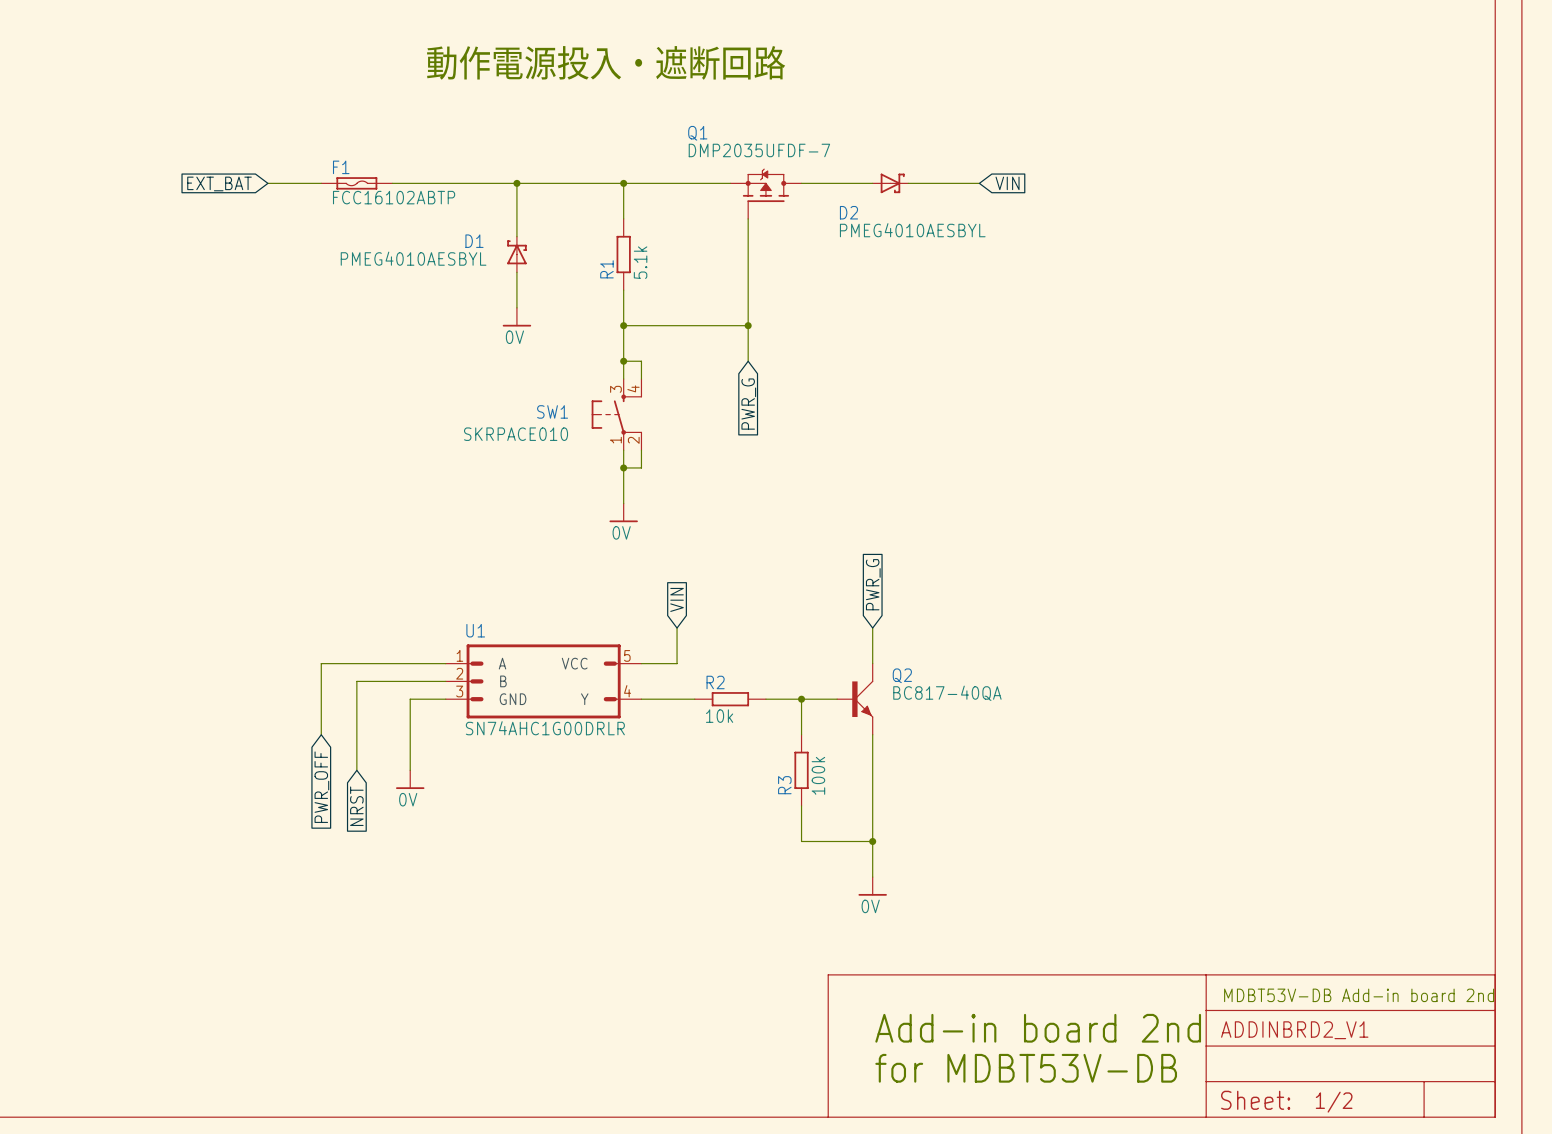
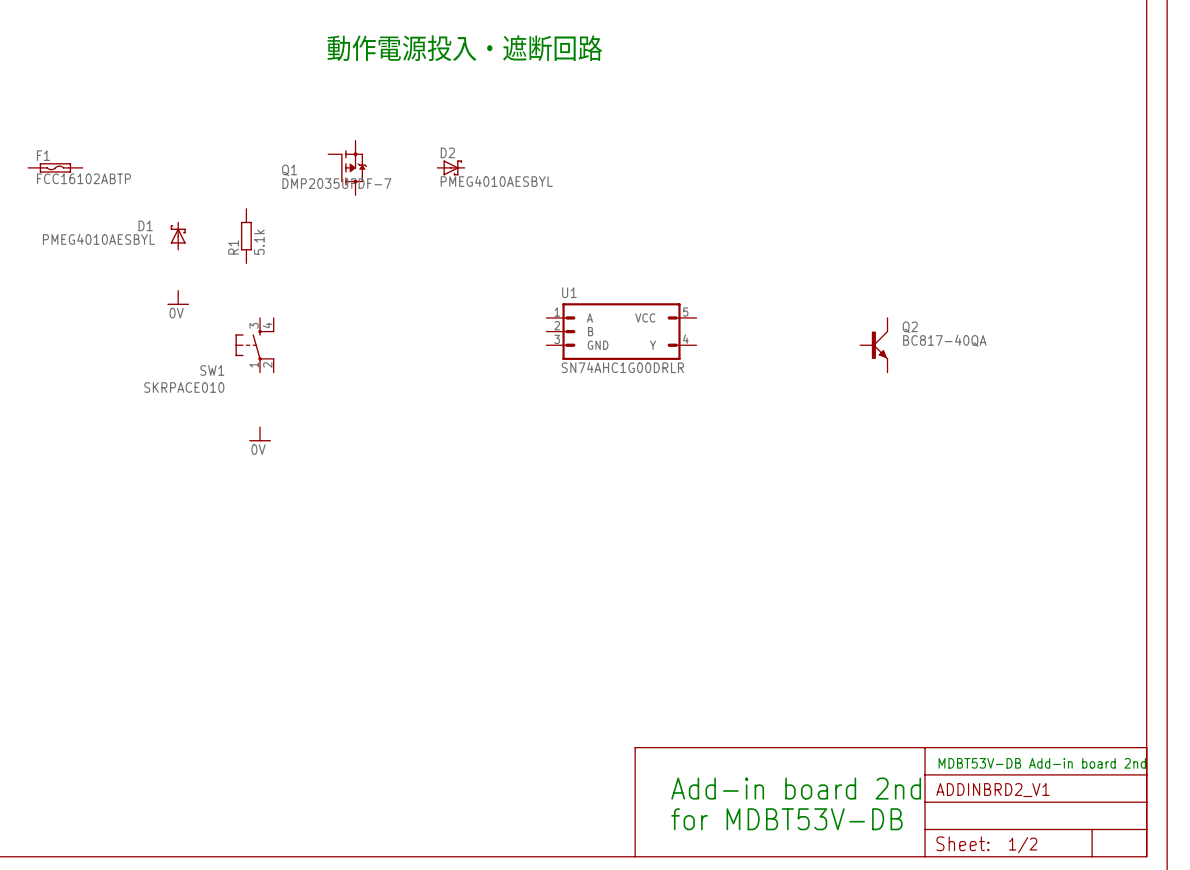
Q1 name position: Q1 (697, 133) -> Q1 (289, 170)
Q1 value position: DMP2035UFDF-7 (759, 150) -> DMP2035UFDF-7 (336, 183)
global label: EXT_BAT (219, 183) -> none
wire: (267, 183) (321, 183) -> none
F1 position: (356, 183) -> (55, 167)
wire: (392, 183) (730, 183) -> none
wire: (516, 183) (516, 236) -> none
junction: (516, 183) -> none
wire: (623, 183) (623, 218) -> none
junction: (623, 183) -> none
wire: (801, 183) (872, 183) -> none
D2 position: (890, 183) -> (451, 167)
wire: (908, 183) (979, 183) -> none
global label: VIN (1007, 183) -> none
Q1 rotation: 0° (765, 185) -> 90° clockwise (354, 167)
Q1 position: (765, 193) -> (347, 167)
D2 name position: D2 (848, 212) -> D2 (447, 152)
wire: (748, 218) (748, 361) -> none
D2 value position: PMEG4010AESBYL (912, 230) -> PMEG4010AESBYL (496, 181)
D1 position: (516, 254) -> (178, 236)
R1 position: (623, 254) -> (246, 236)
wire: (516, 272) (516, 307) -> none
wire: (623, 290) (623, 379) -> none
power symbol: 0V (516, 317) -> none
wire: (623, 325) (748, 325) -> none
junction: (623, 325) -> none
junction: (748, 325) -> none
wire: (623, 361) (641, 361) (641, 379) -> none
junction: (623, 361) -> none
power symbol: none -> 0V (178, 297)
global label: PWR_G (748, 404) -> none
SW1 name position: SW1 (552, 411) -> SW1 (212, 370)
SW1 position: (616, 414) -> (254, 345)
SW1 value position: SKRPACE010 (516, 434) -> SKRPACE010 (184, 387)
wire: (623, 450) (623, 503) -> none
wire: (641, 450) (641, 467) (623, 467) -> none
junction: (623, 467) -> none
power symbol: 0V (623, 512) -> none
power symbol: none -> 0V (260, 434)
global label: PWR_G (873, 584) -> none
global label: VIN (677, 599) -> none
wire: (677, 628) (677, 663) (641, 663) -> none
wire: (872, 628) (872, 663) -> none
wire: (445, 663) (321, 663) (321, 734) -> none
wire: (445, 681) (356, 681) (356, 770) -> none
U1 position: (543, 681) -> (621, 331)
wire: (445, 699) (410, 699) (410, 770) -> none
wire: (641, 699) (694, 699) -> none
R2: 10k (730, 699) -> none
wire: (765, 699) (837, 699) -> none
wire: (801, 699) (801, 734) -> none
junction: (801, 699) -> none
Q2 position: (855, 699) -> (874, 345)
wire: (872, 734) (872, 877) -> none
R3: 100k (801, 770) -> none
power symbol: 0V (410, 779) -> none
global label: PWR_OFF (321, 787) -> none
wire: (801, 805) (801, 841) (872, 841) -> none
global label: NRST (356, 806) -> none
junction: (872, 841) -> none
power symbol: 0V (872, 886) -> none

